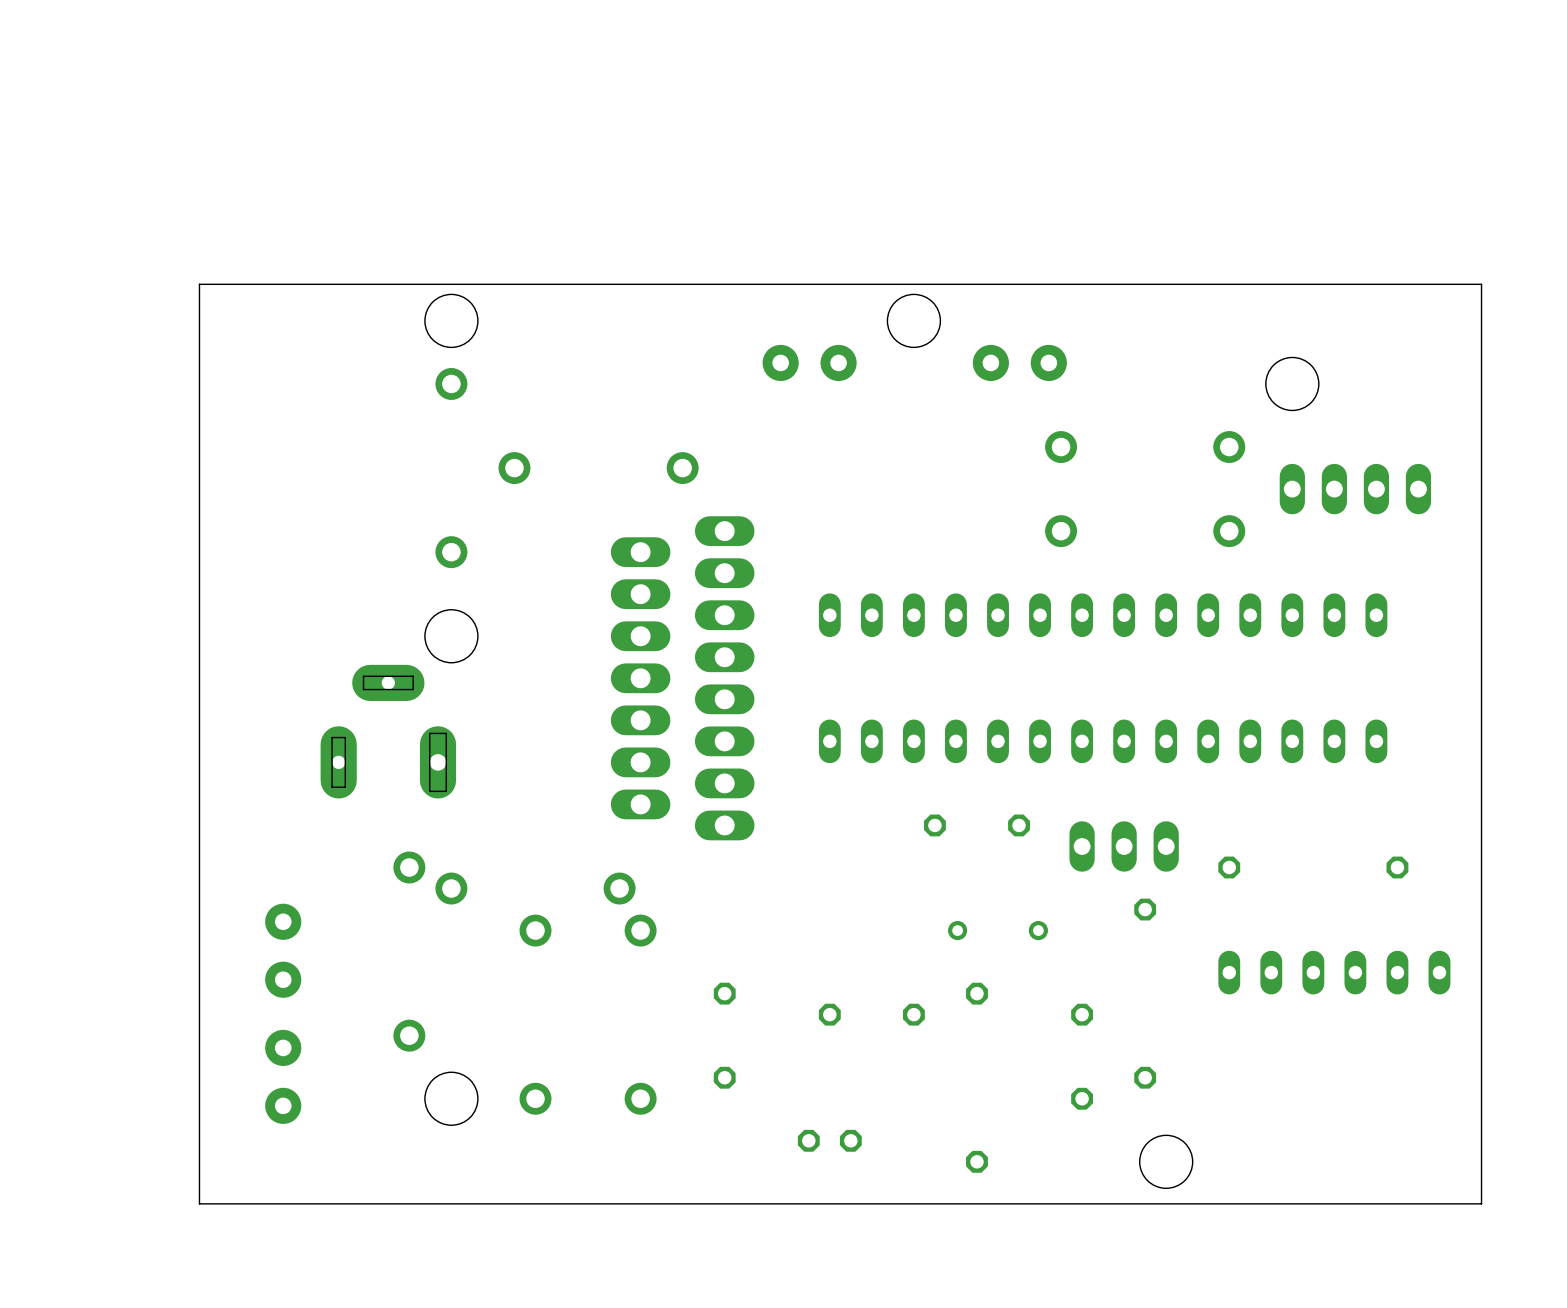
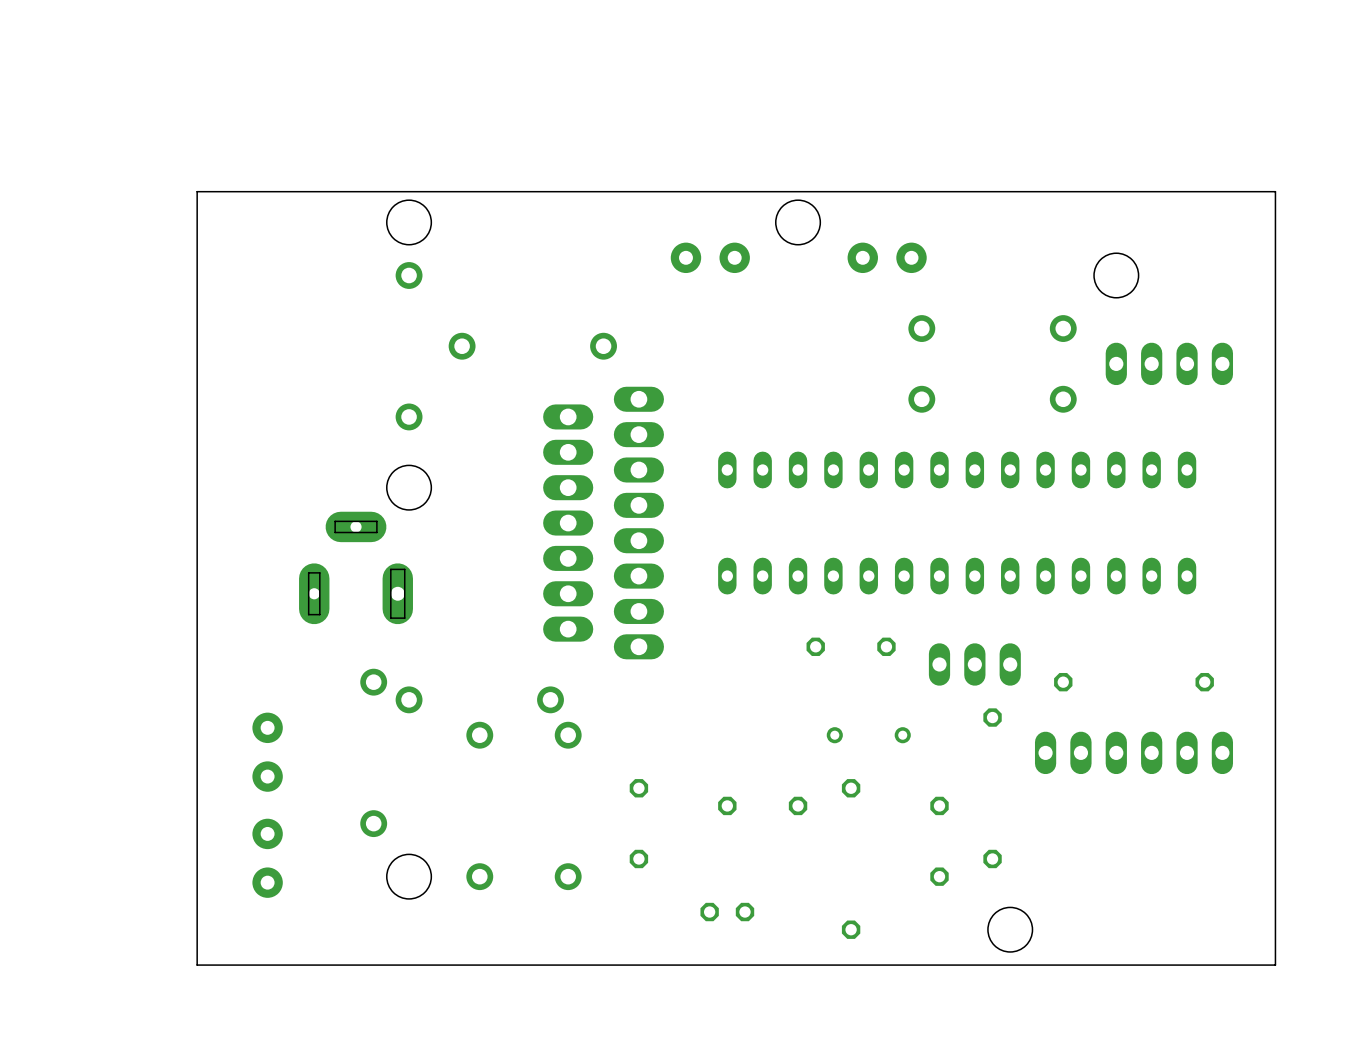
part: none -> (1133, 752)
part: (1334, 972) -> none

